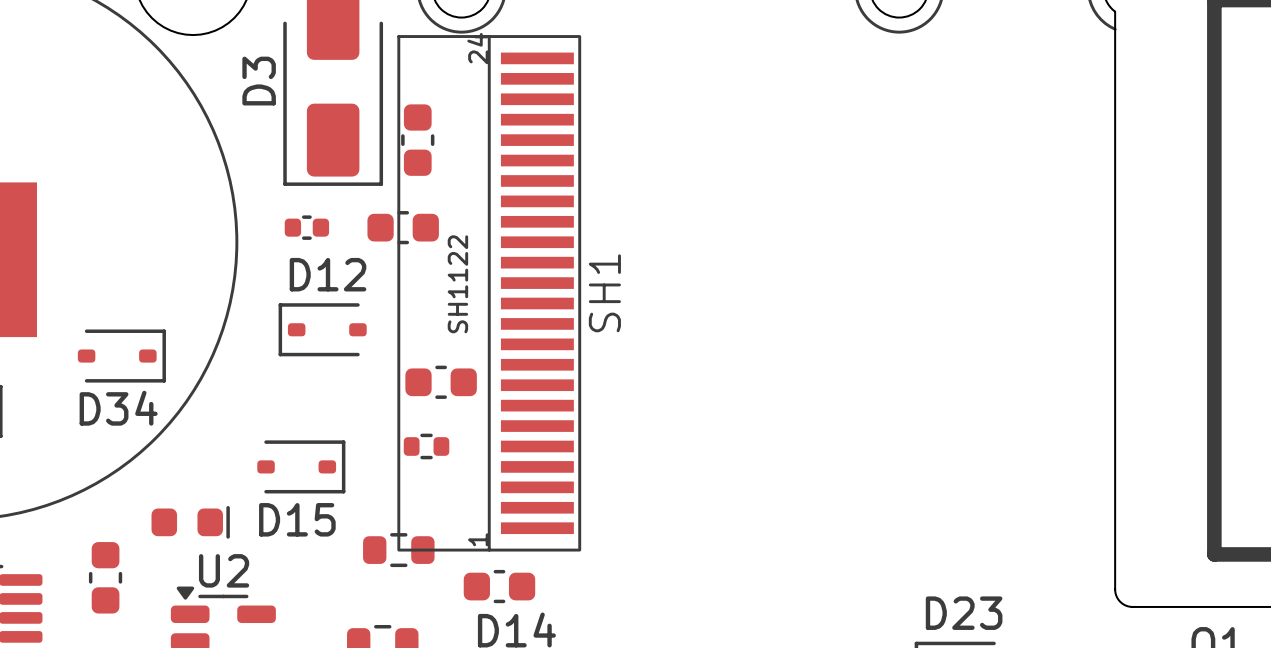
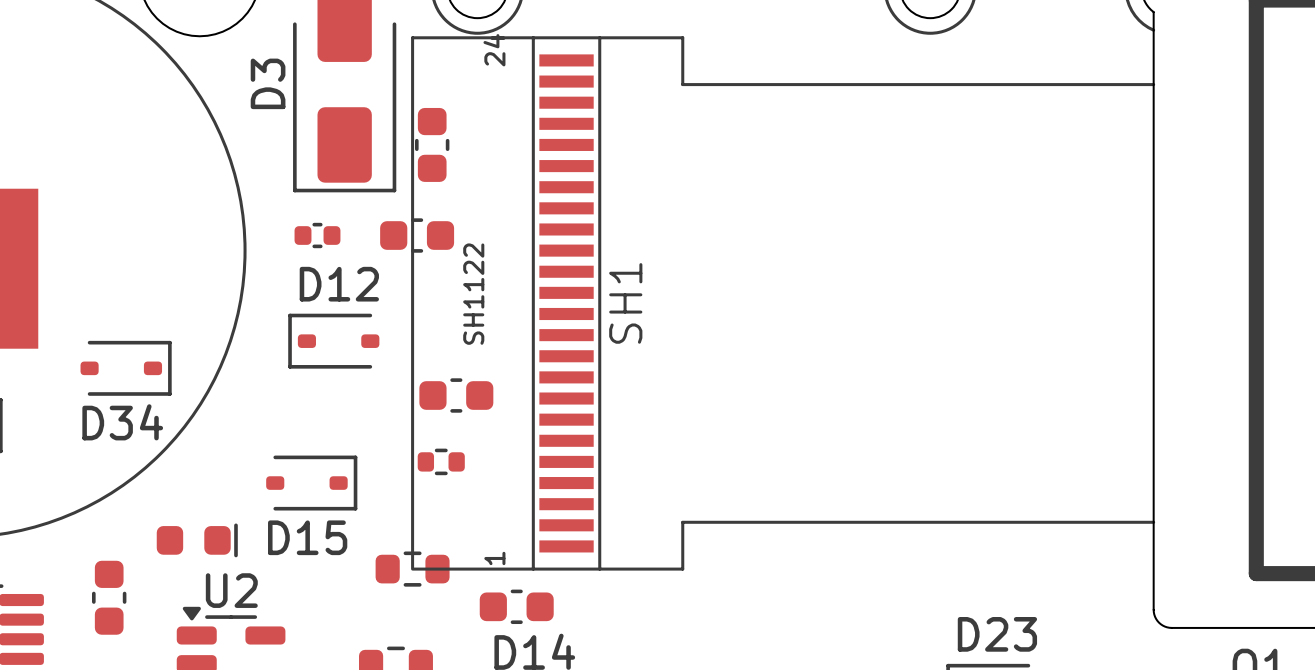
SH1 footprint: [397, 35, 582, 552] -> [411, 36, 602, 571]
line: none -> (599, 37) (682, 37) (682, 84) (1153, 84)
line: none -> (1153, 522) (682, 522) (682, 569) (599, 569)

